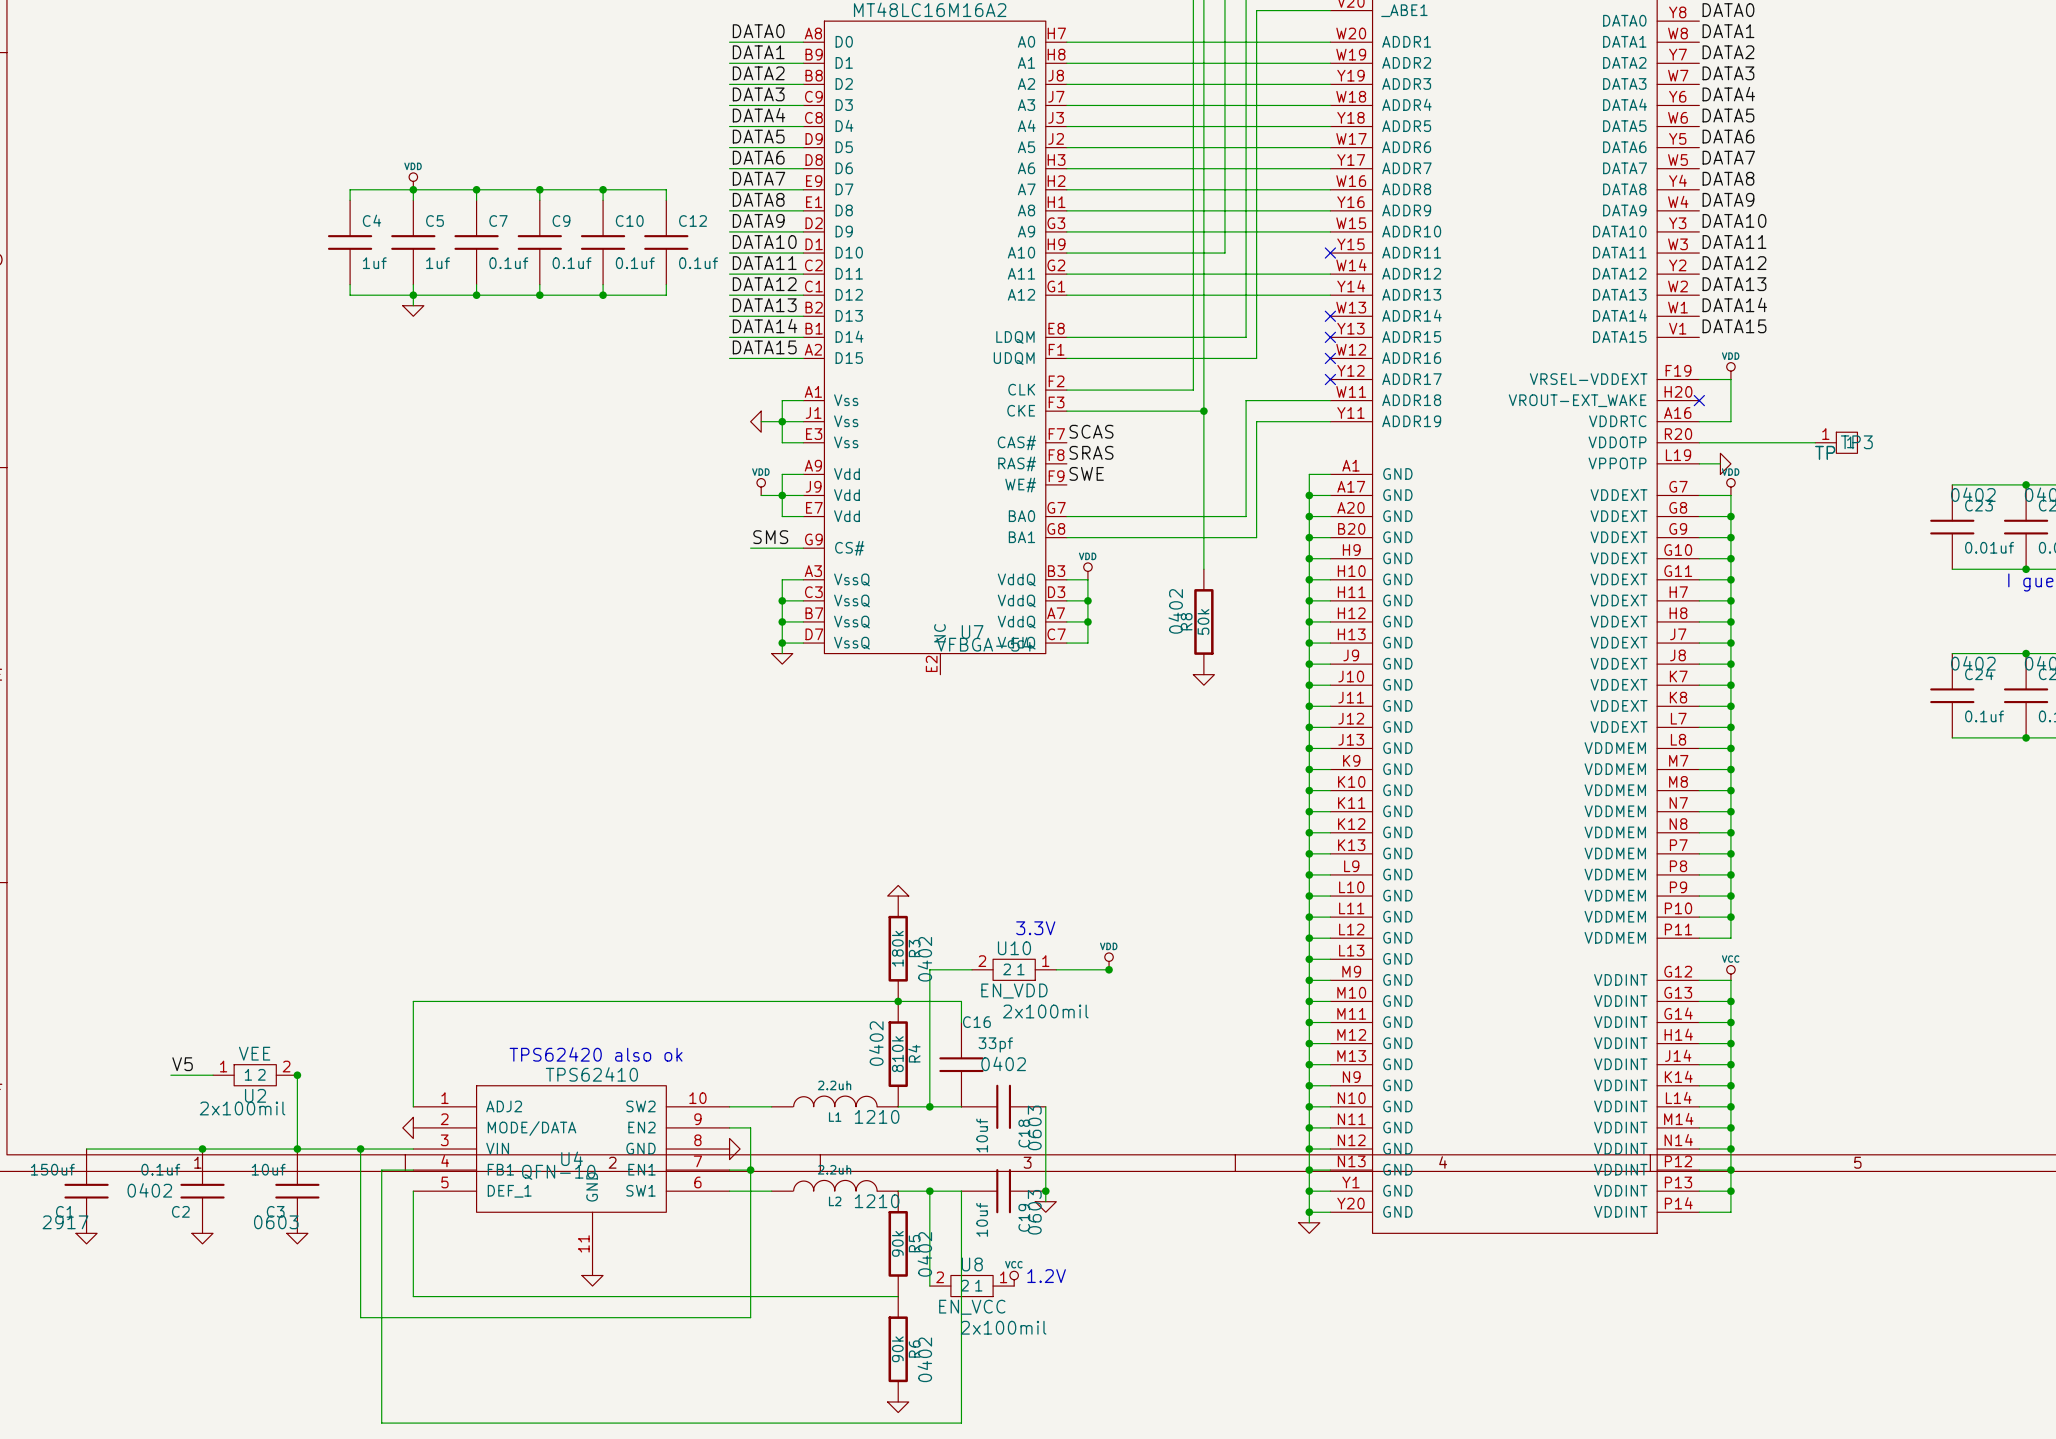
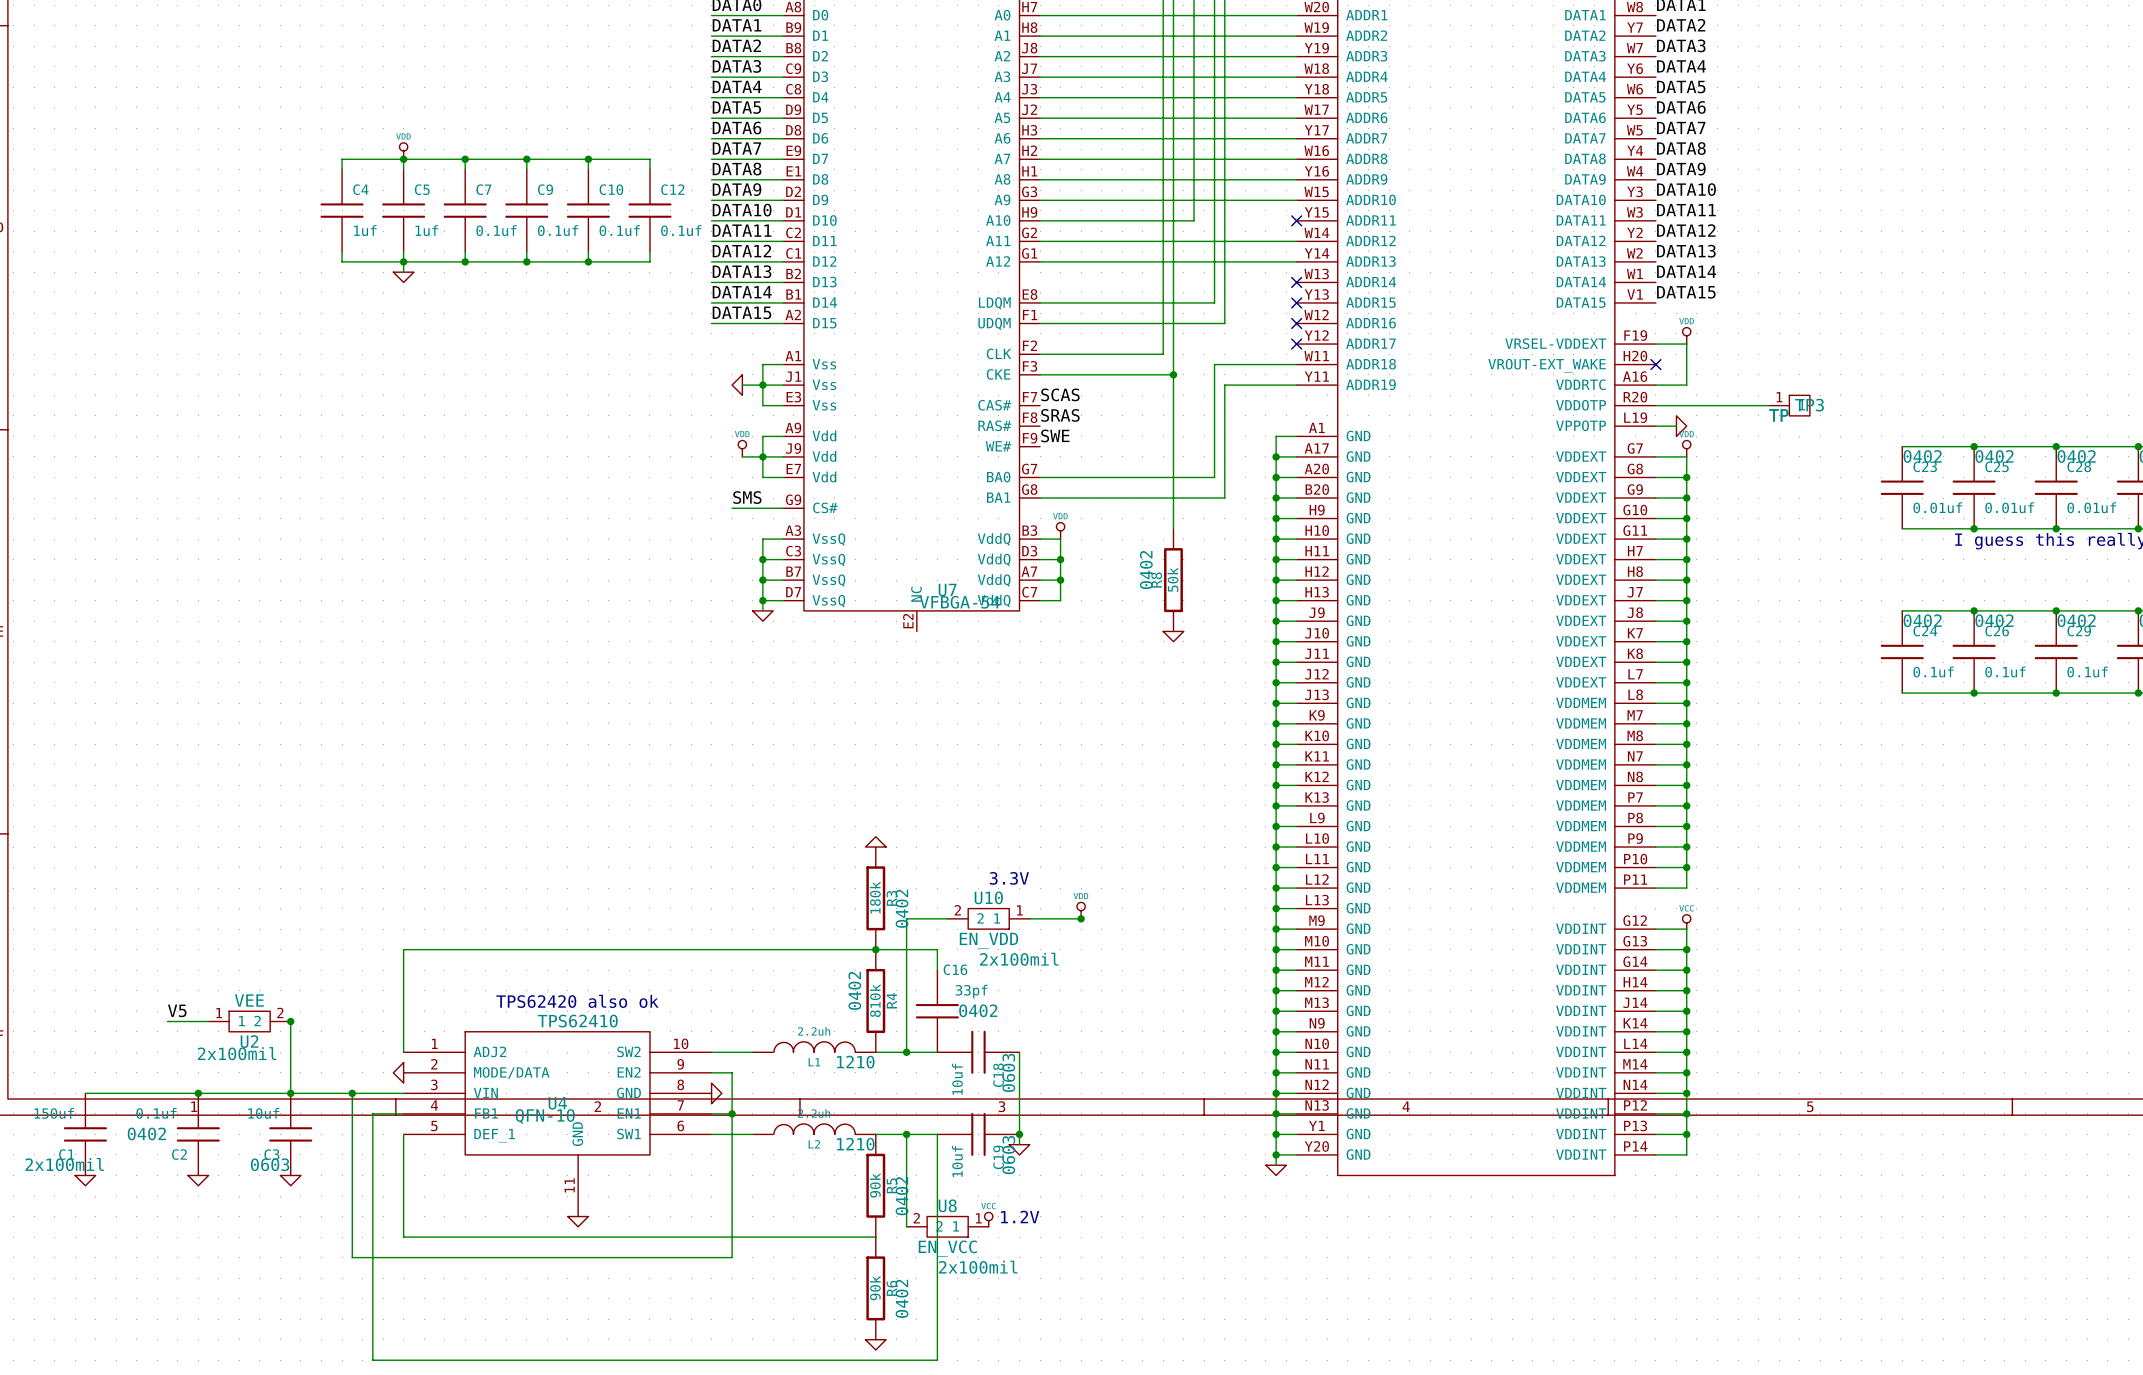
C1 text: 2917 (65, 1222) -> 2x100mil (64, 1164)

